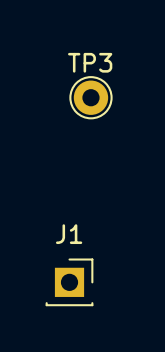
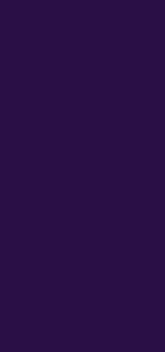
TP3: (90, 97) -> none
J1: (69, 282) -> none

